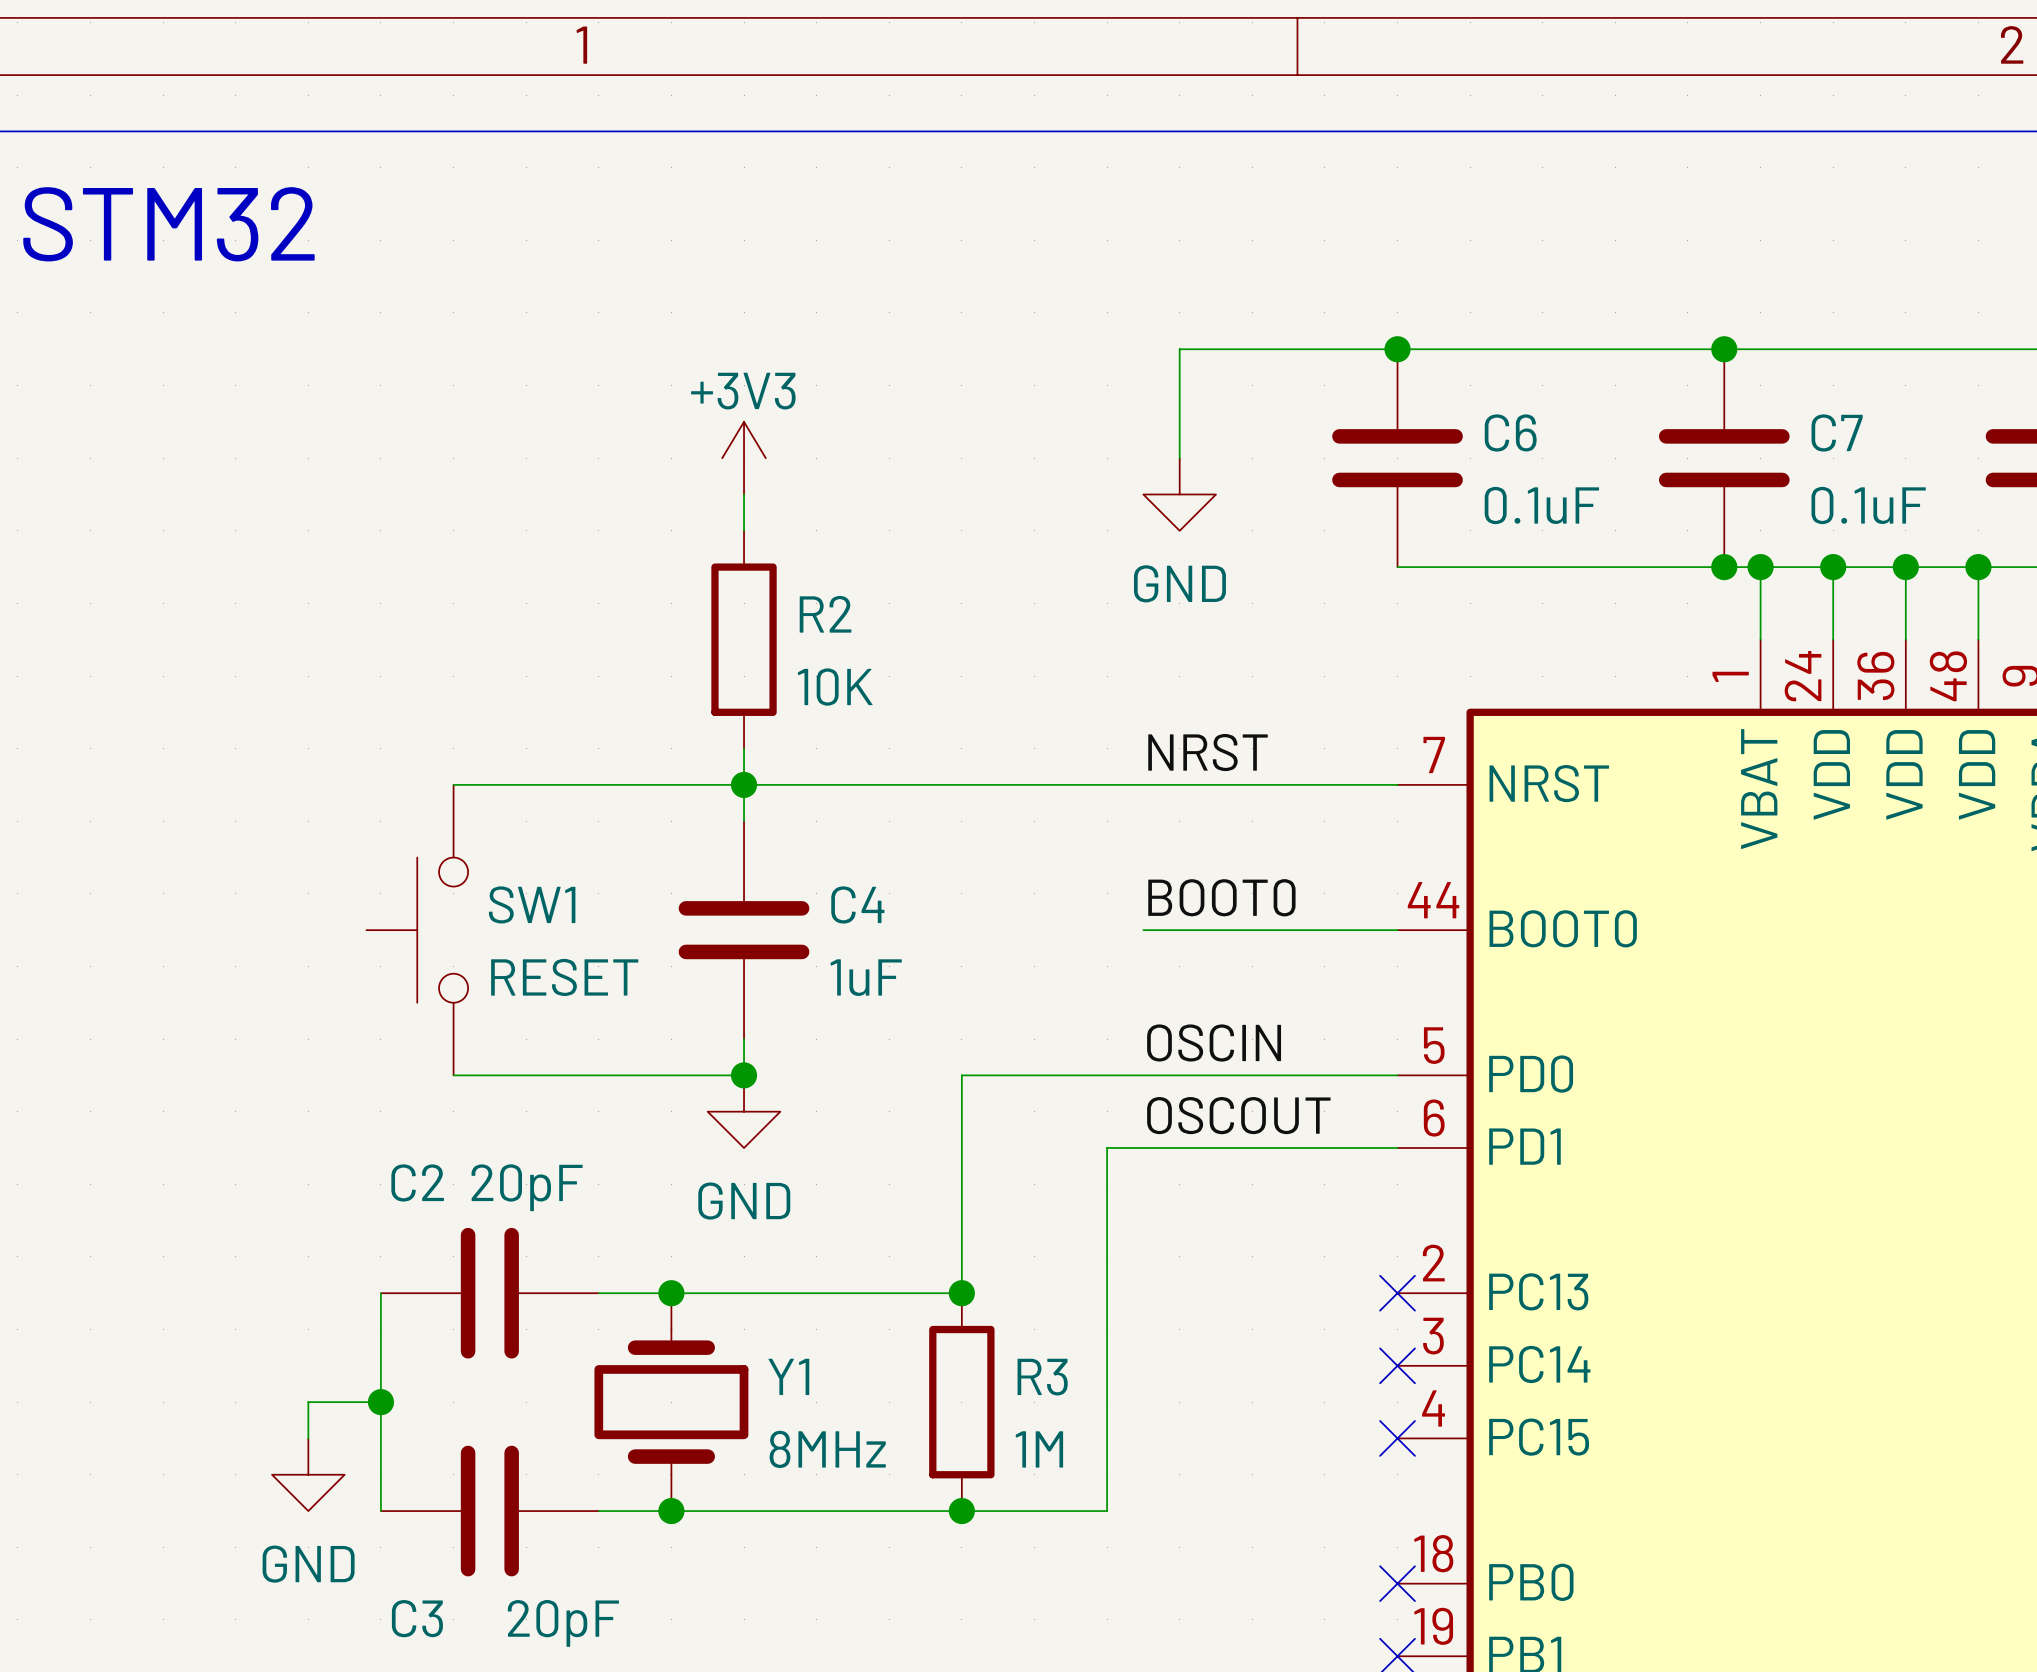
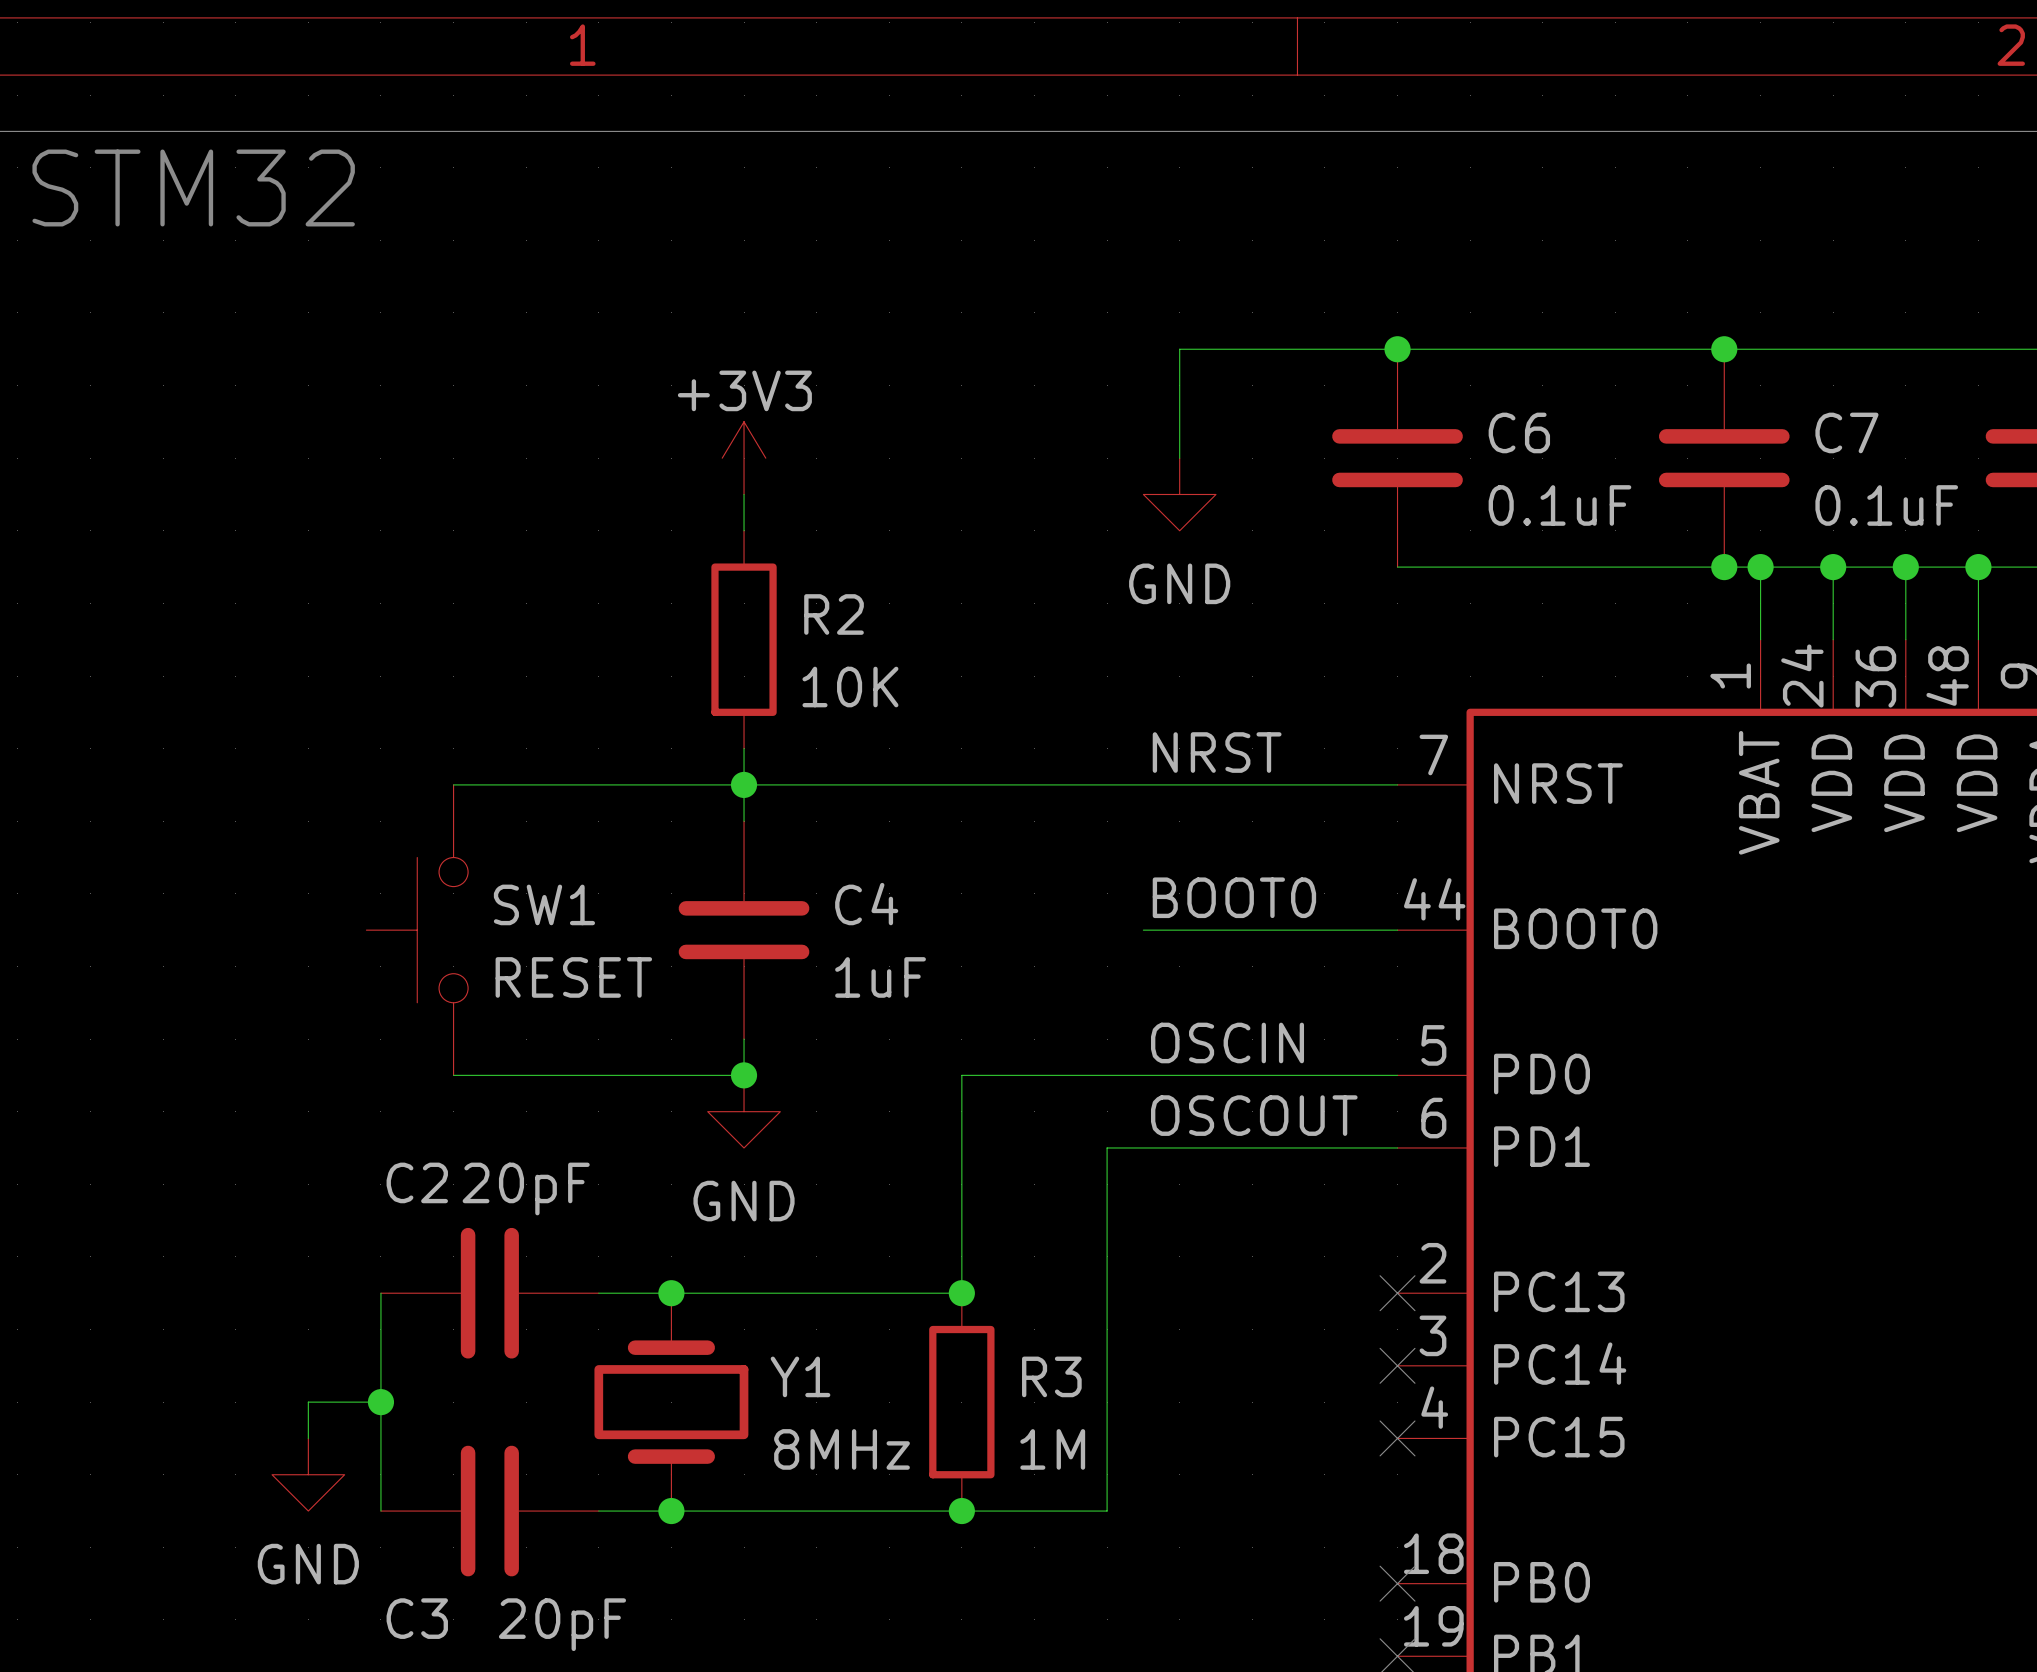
text position: STM32 (168, 224) -> STM32 (193, 188)

